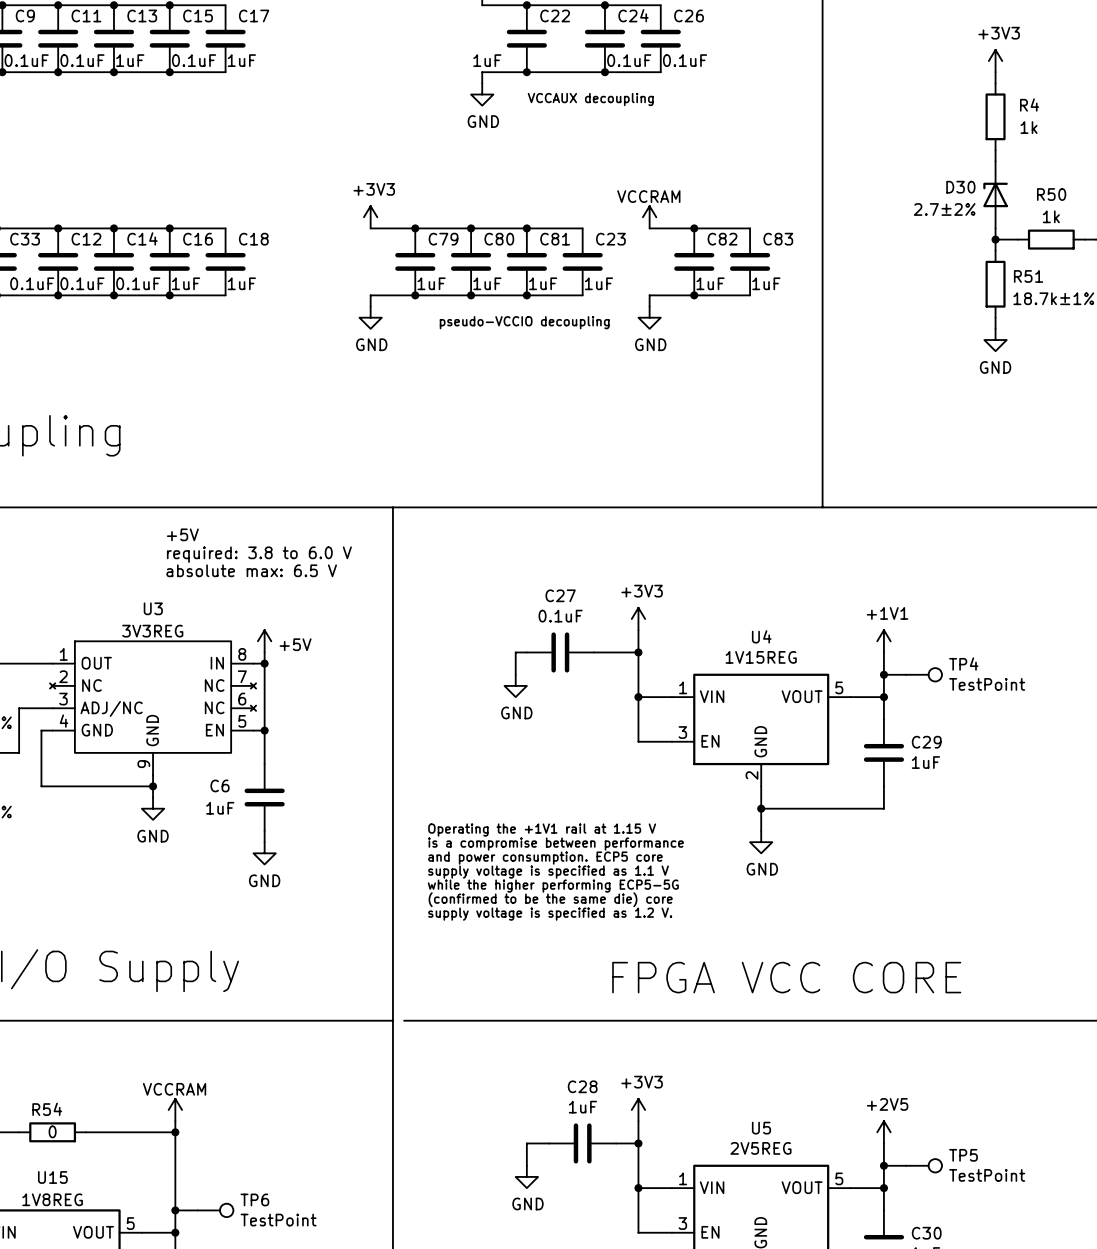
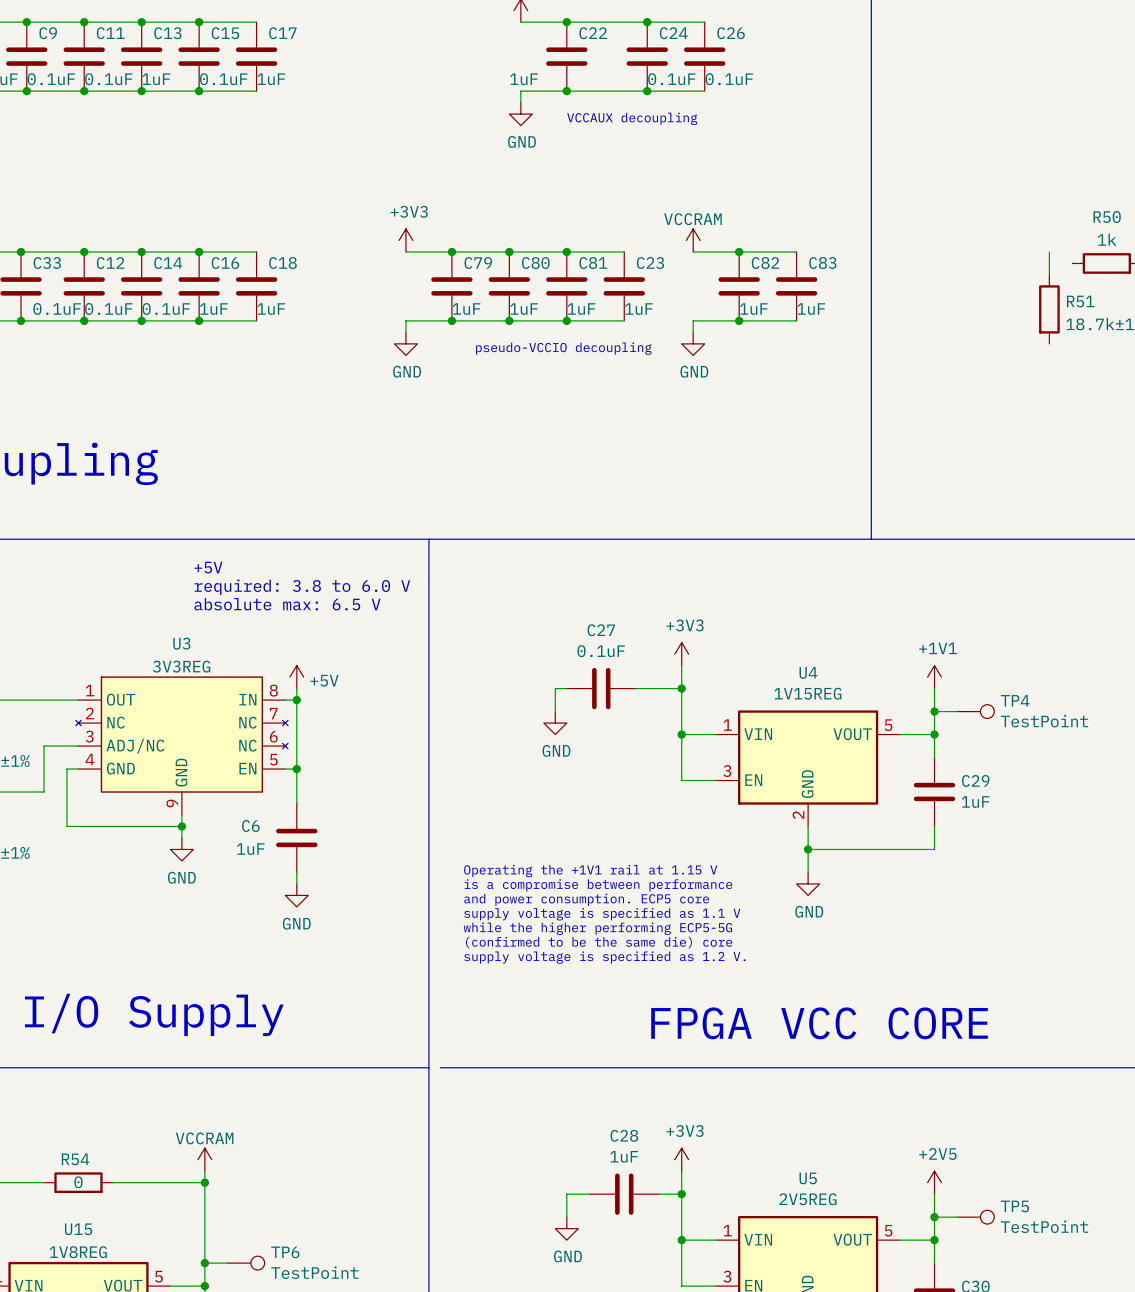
power symbol: +3V3 (995, 61) -> none
wire: (995, 72) (995, 83) -> none
R4: 1k (995, 116) -> none
wire: (995, 150) (995, 161) -> none
D30: 2.7±2% (995, 194) -> none
wire: (995, 239) (1017, 239) -> none
junction: (995, 239) -> none
wire: (995, 317) (995, 328) -> none
power symbol: GND (995, 340) -> none

